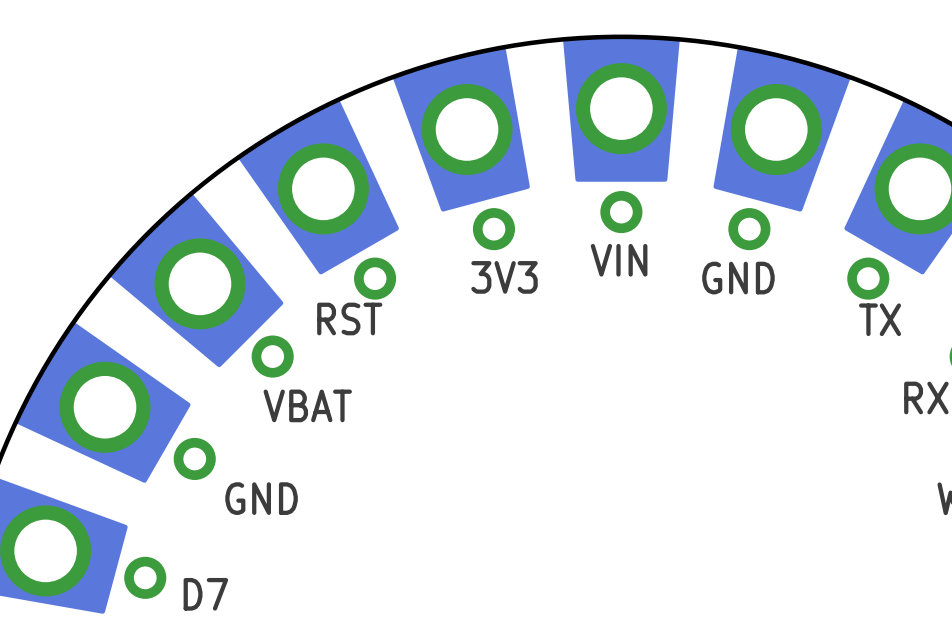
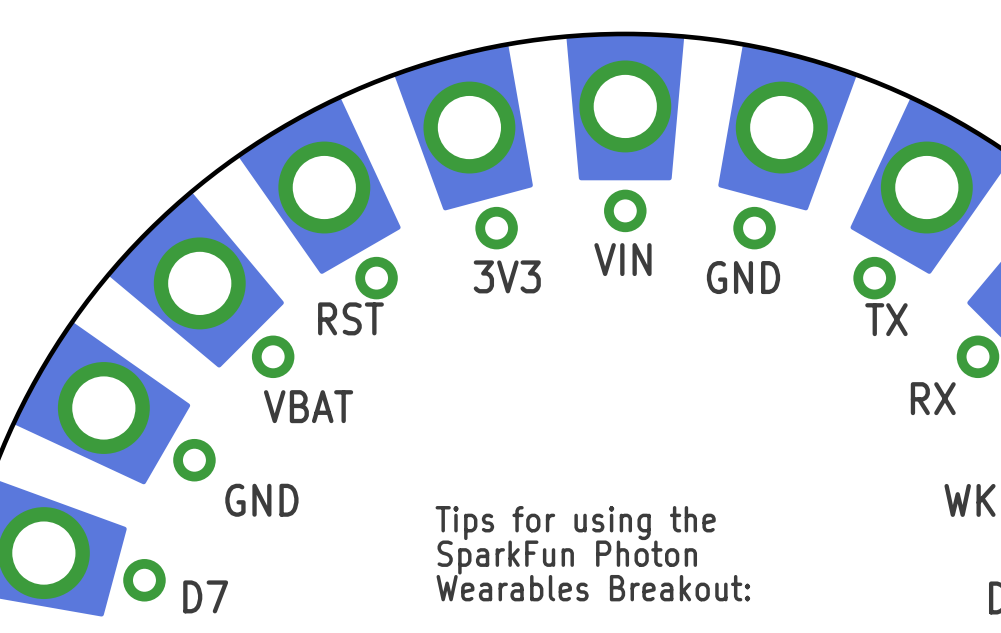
text: none -> Tips for using the (575, 523)
text: none -> SparkFun Photon (567, 557)
text: none -> Wearables Breakout: (593, 588)

